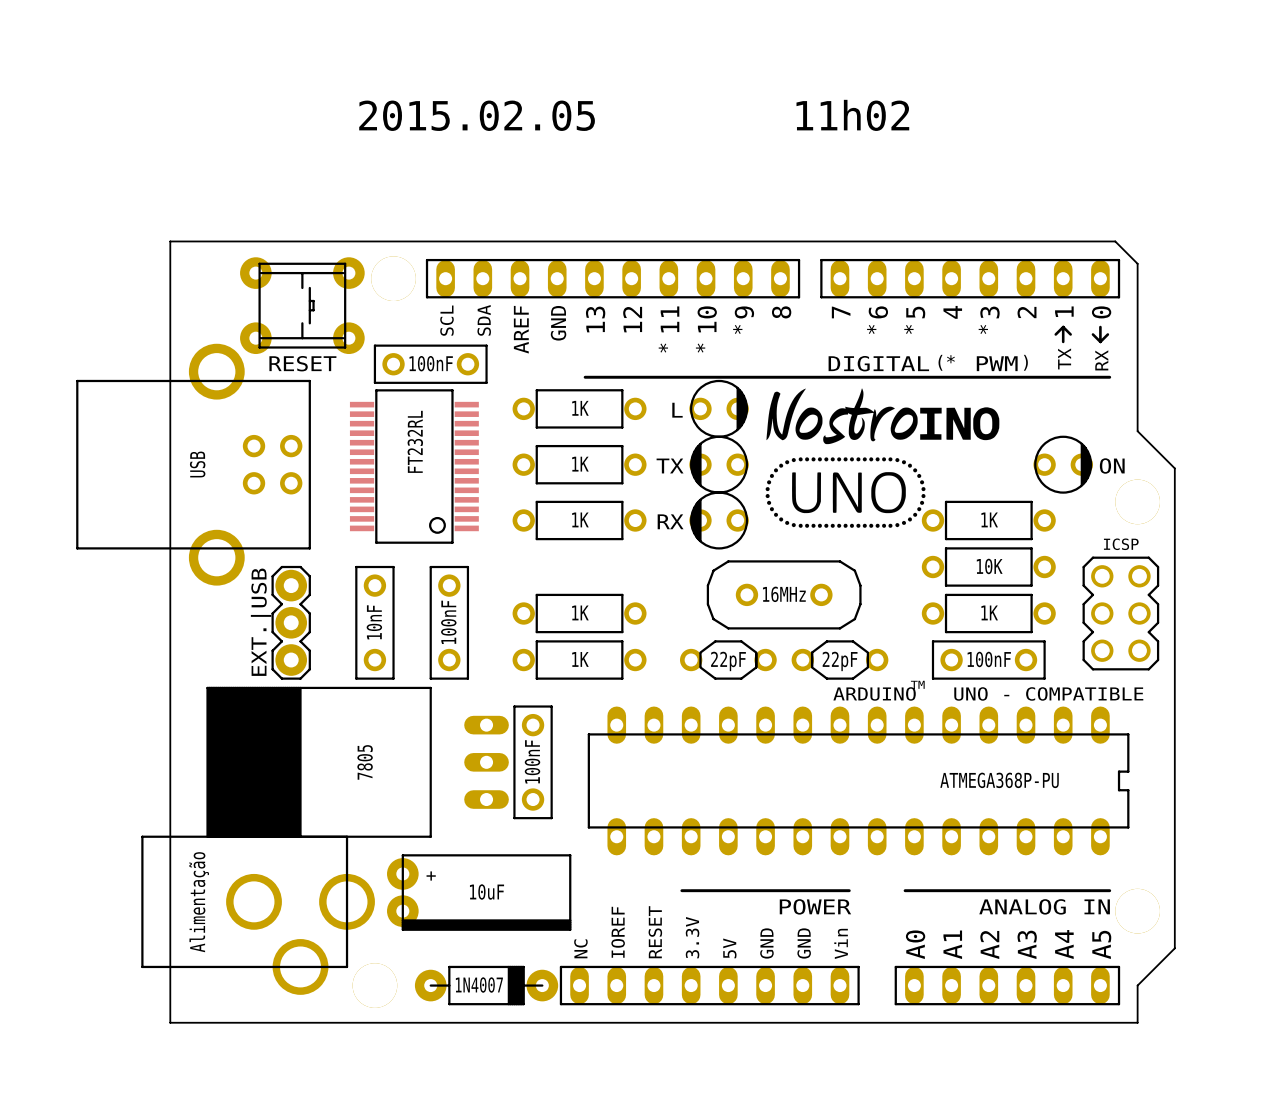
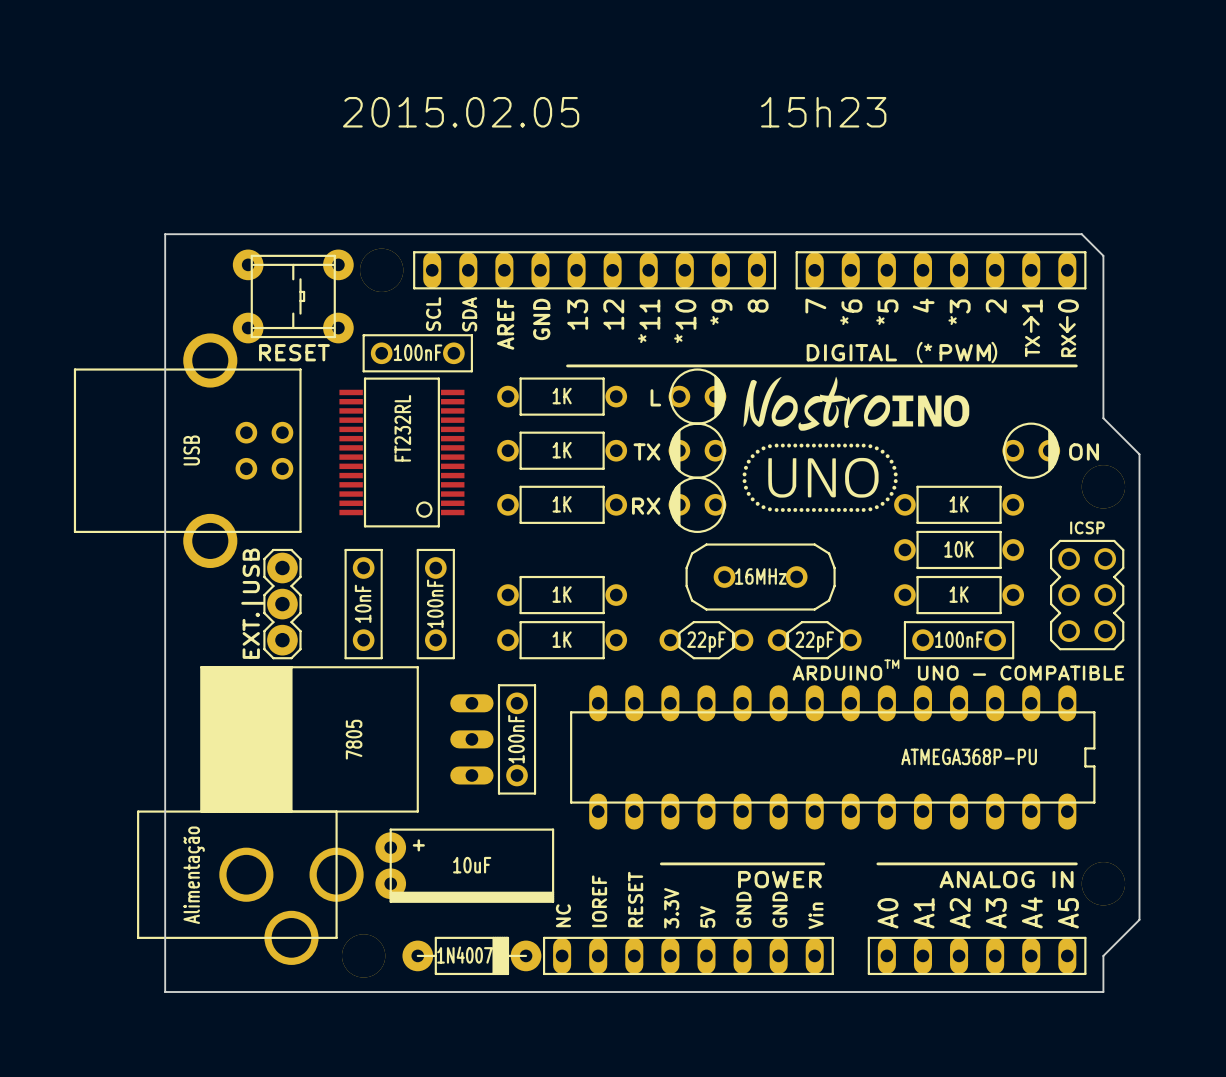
text: 2015.02.05 11h02 (634, 115) -> 2015.02.05 15h23 (614, 112)

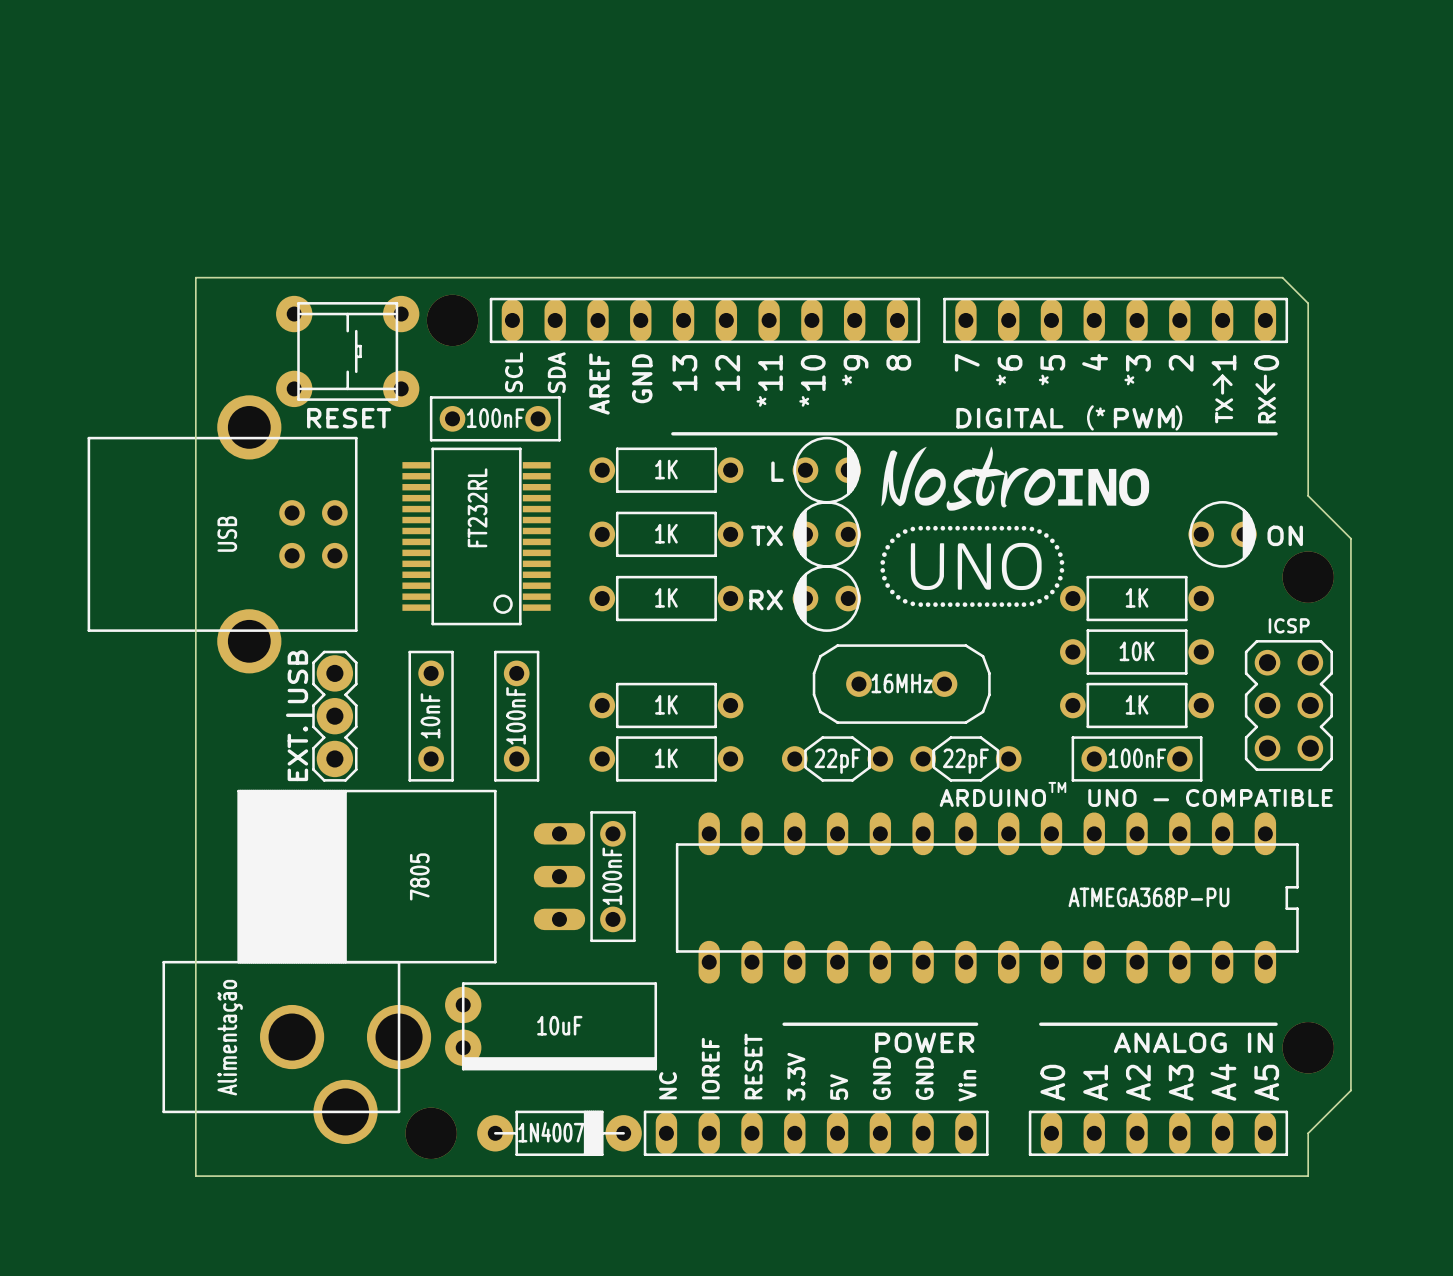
text: 2015.02.05 15h23 (614, 112) -> none
text: + (418, 845) -> none

